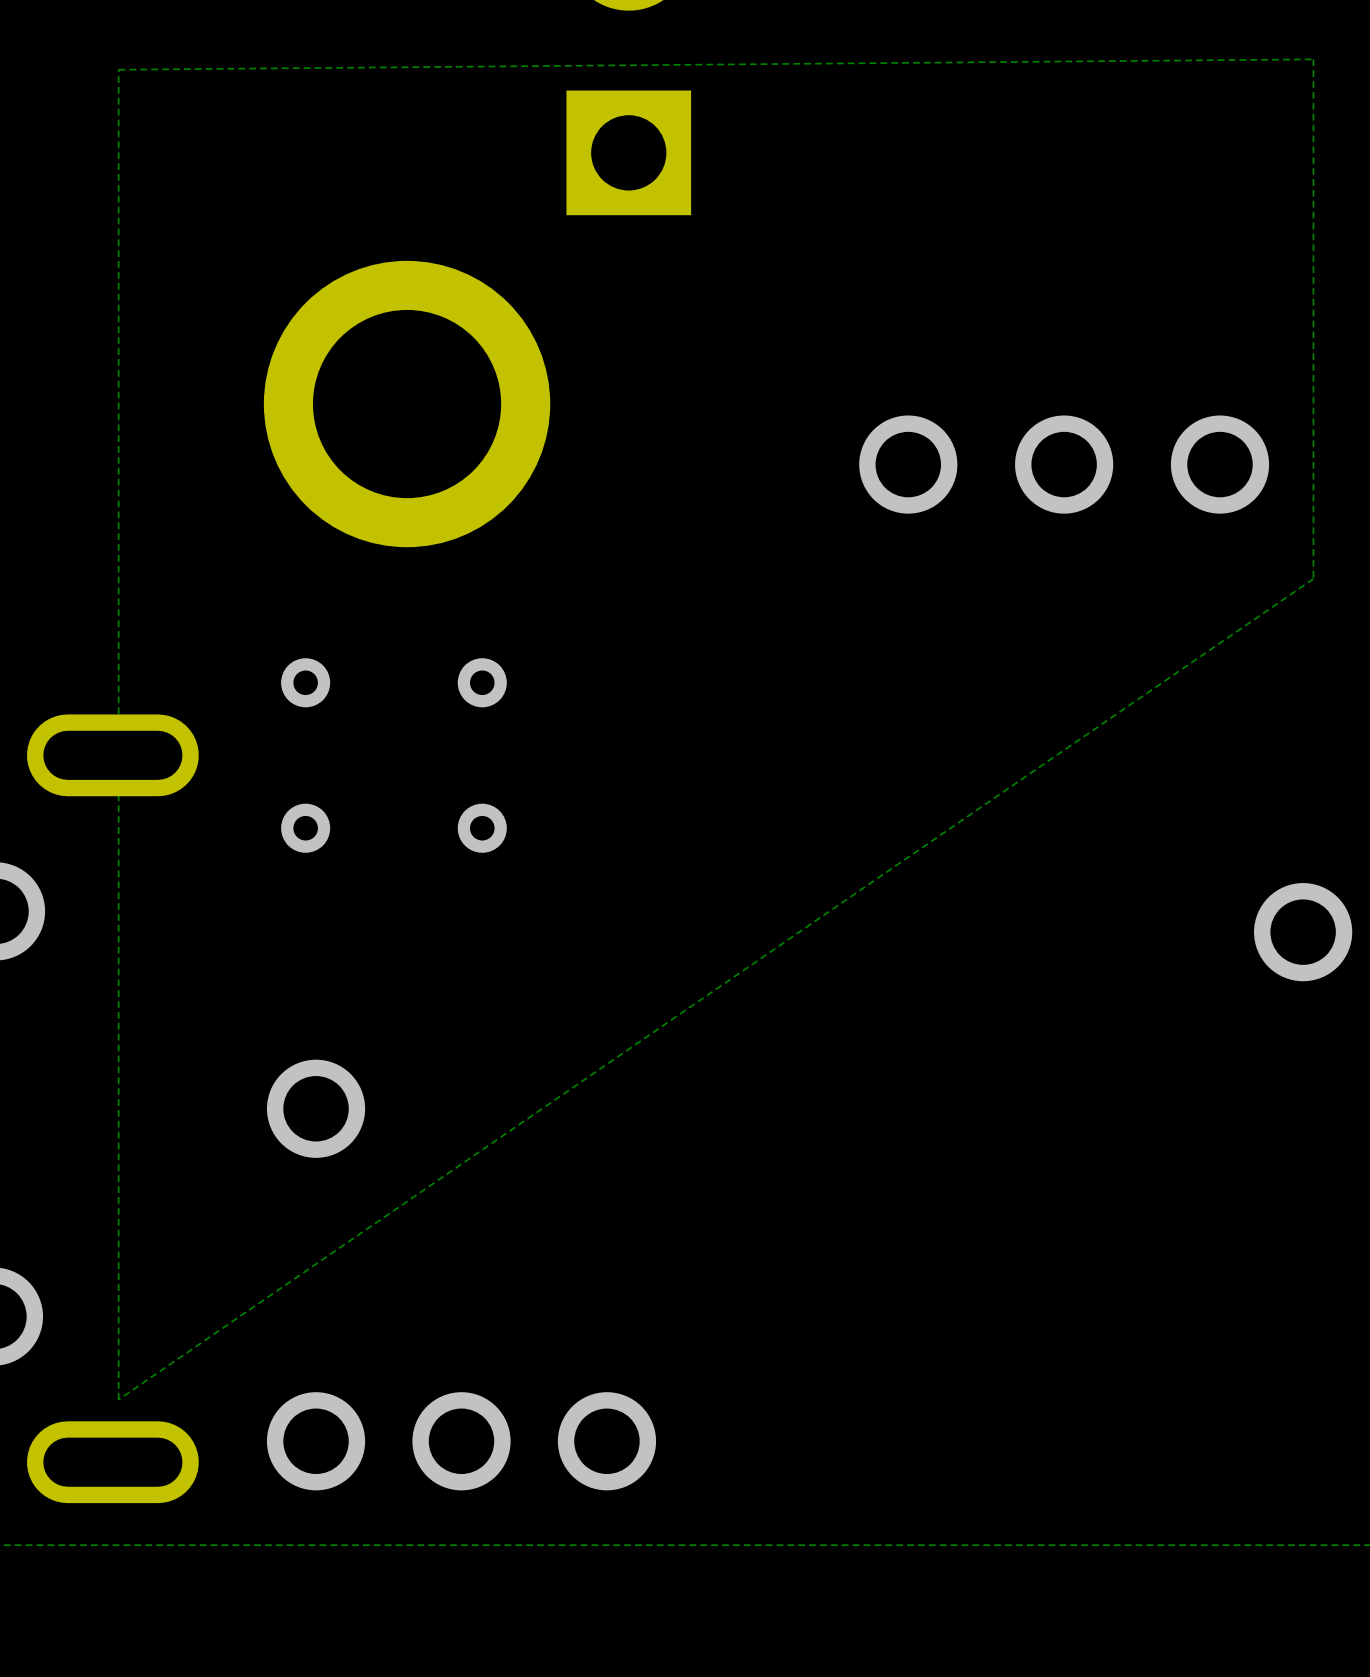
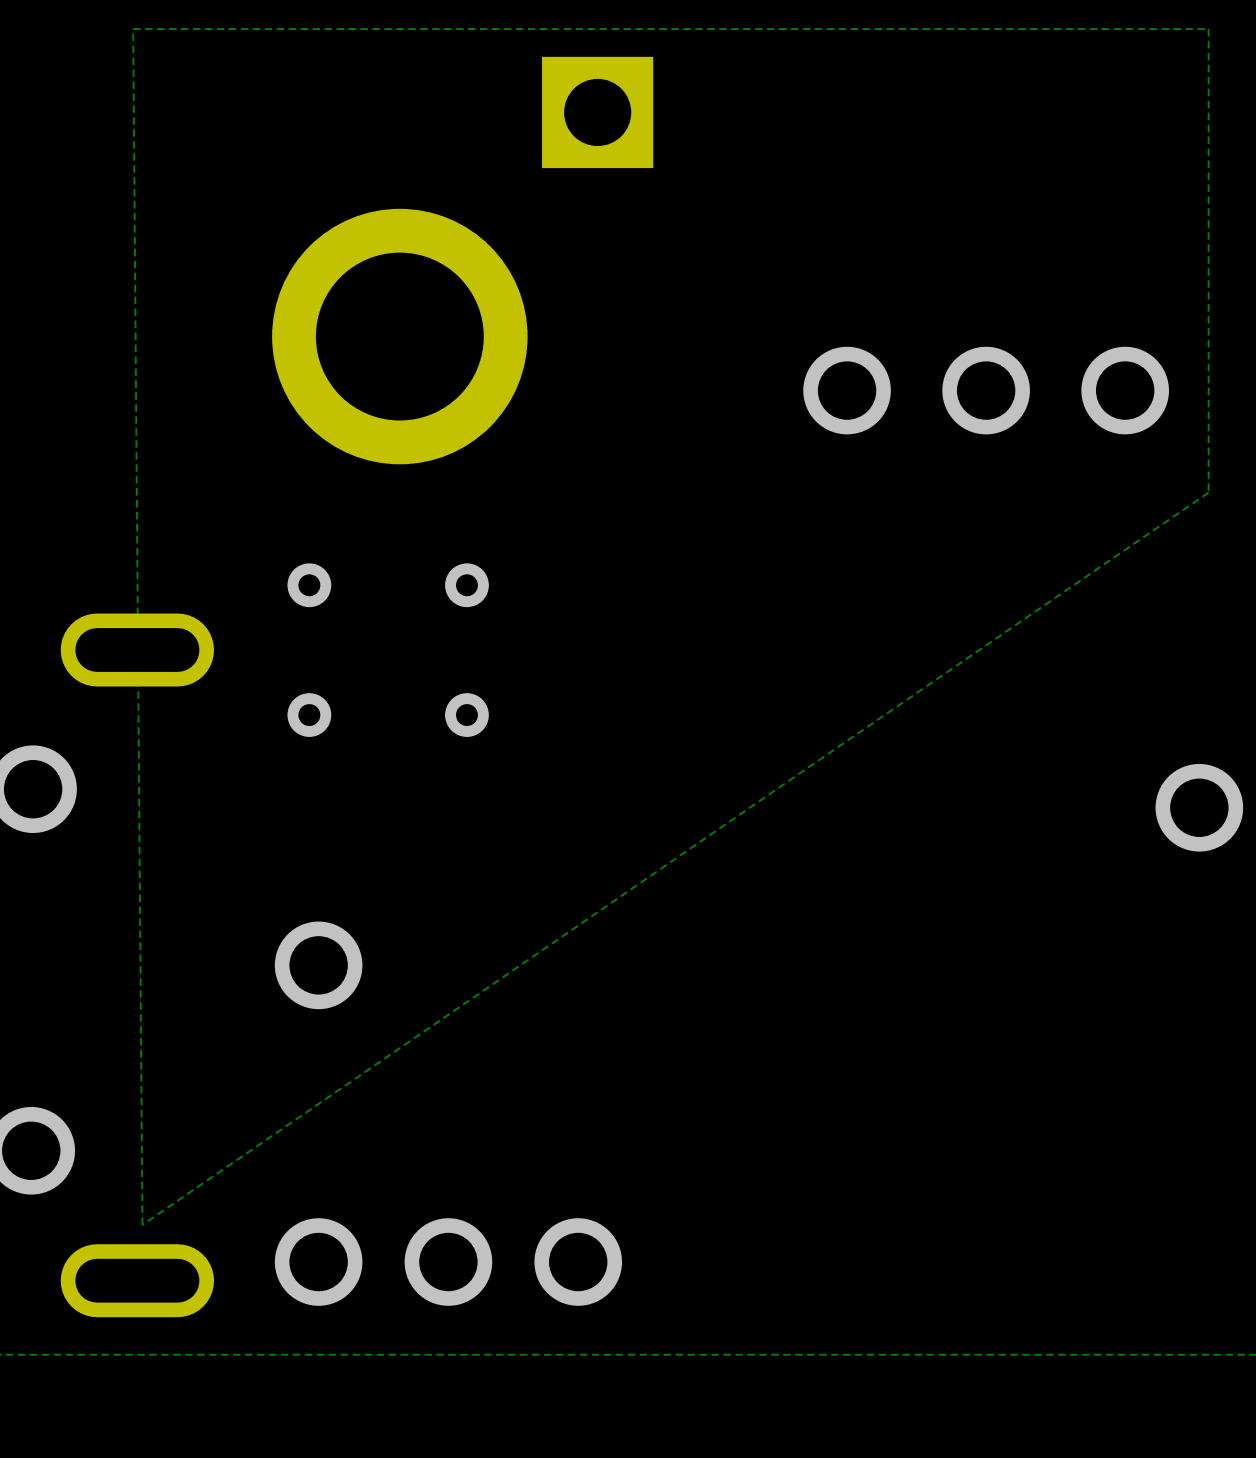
zone outline: (1313, 59) (118, 69) (118, 1399) -> (1208, 29) (133, 29) (142, 1224)

